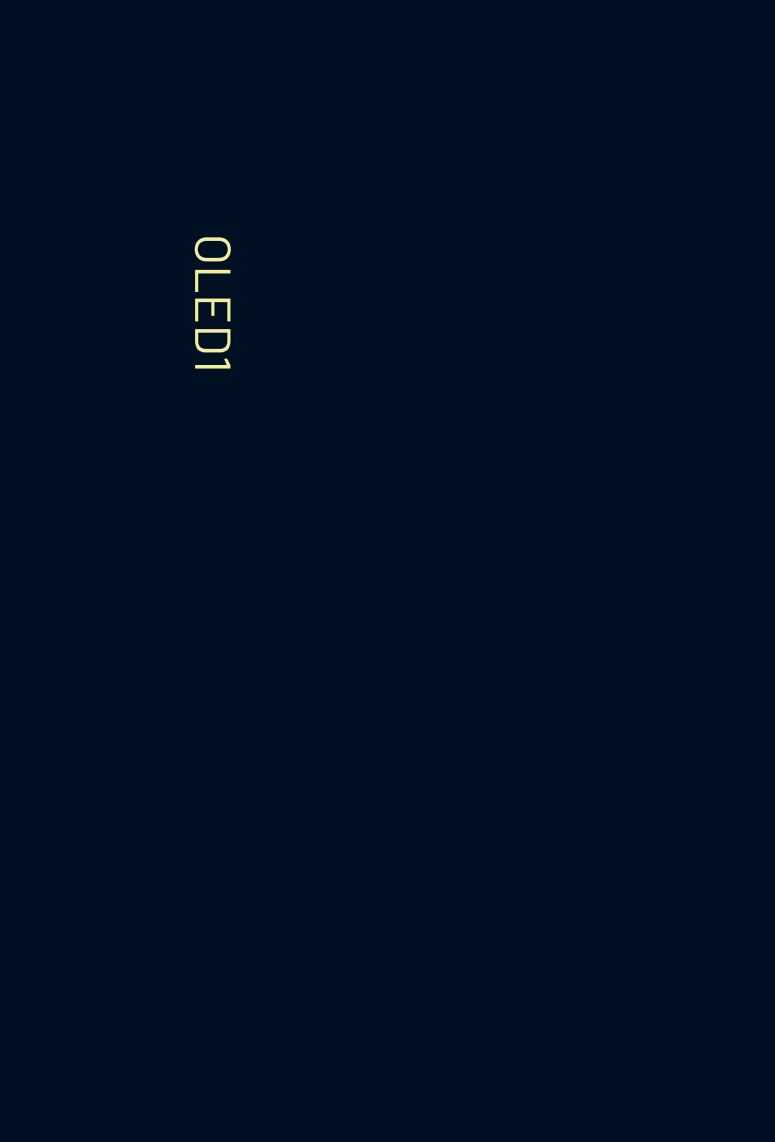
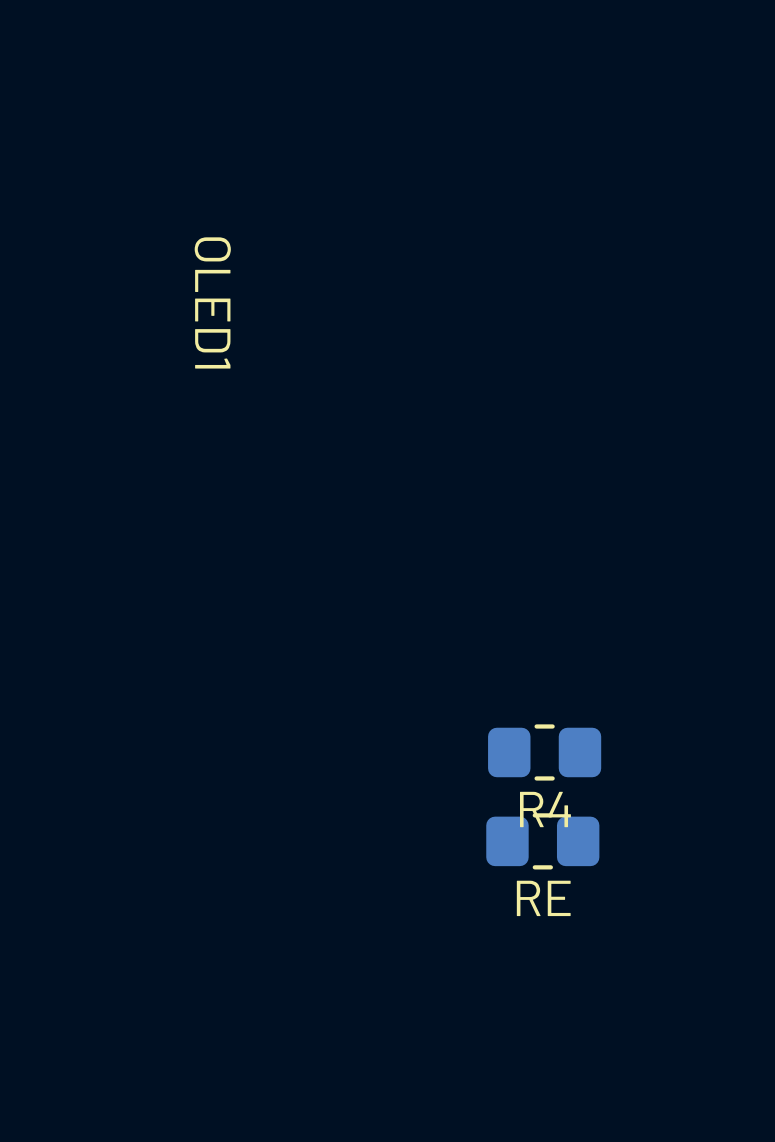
R4: none -> (544, 752)
RE: none -> (542, 841)

